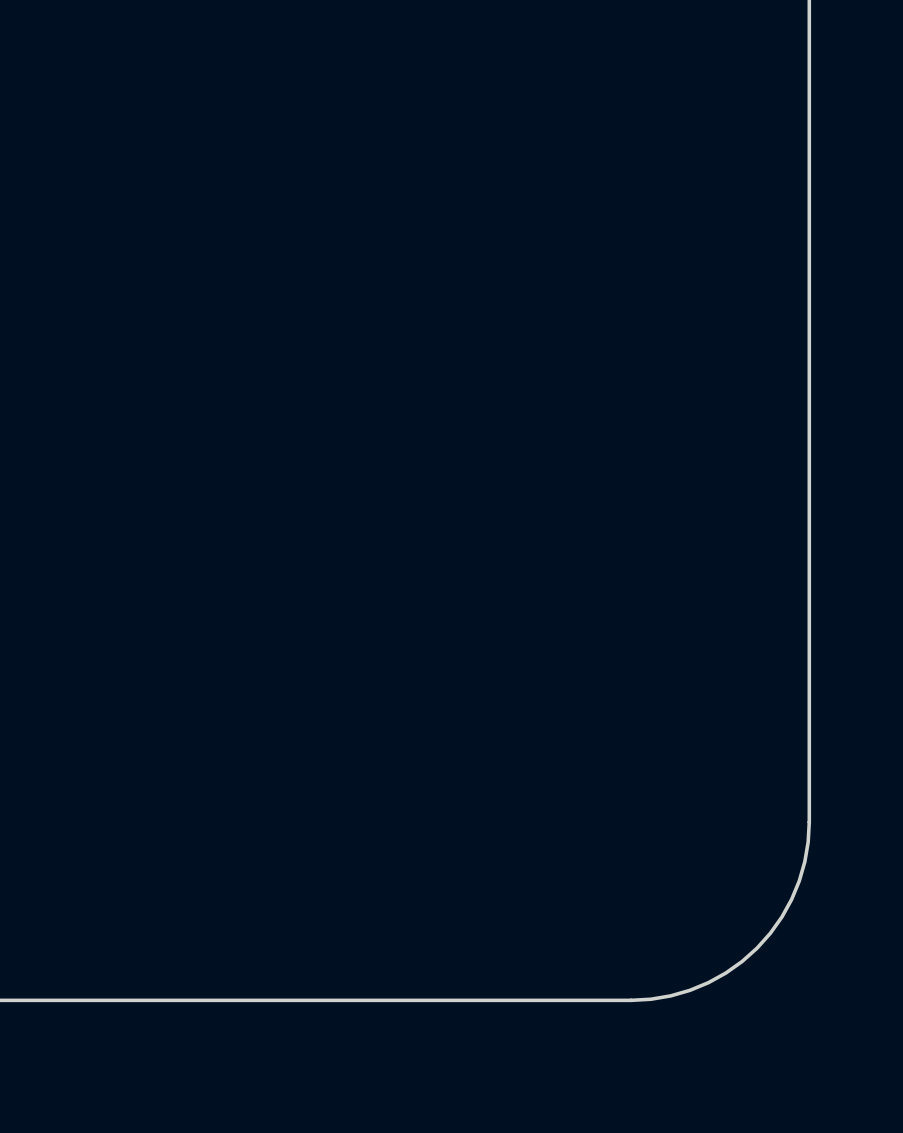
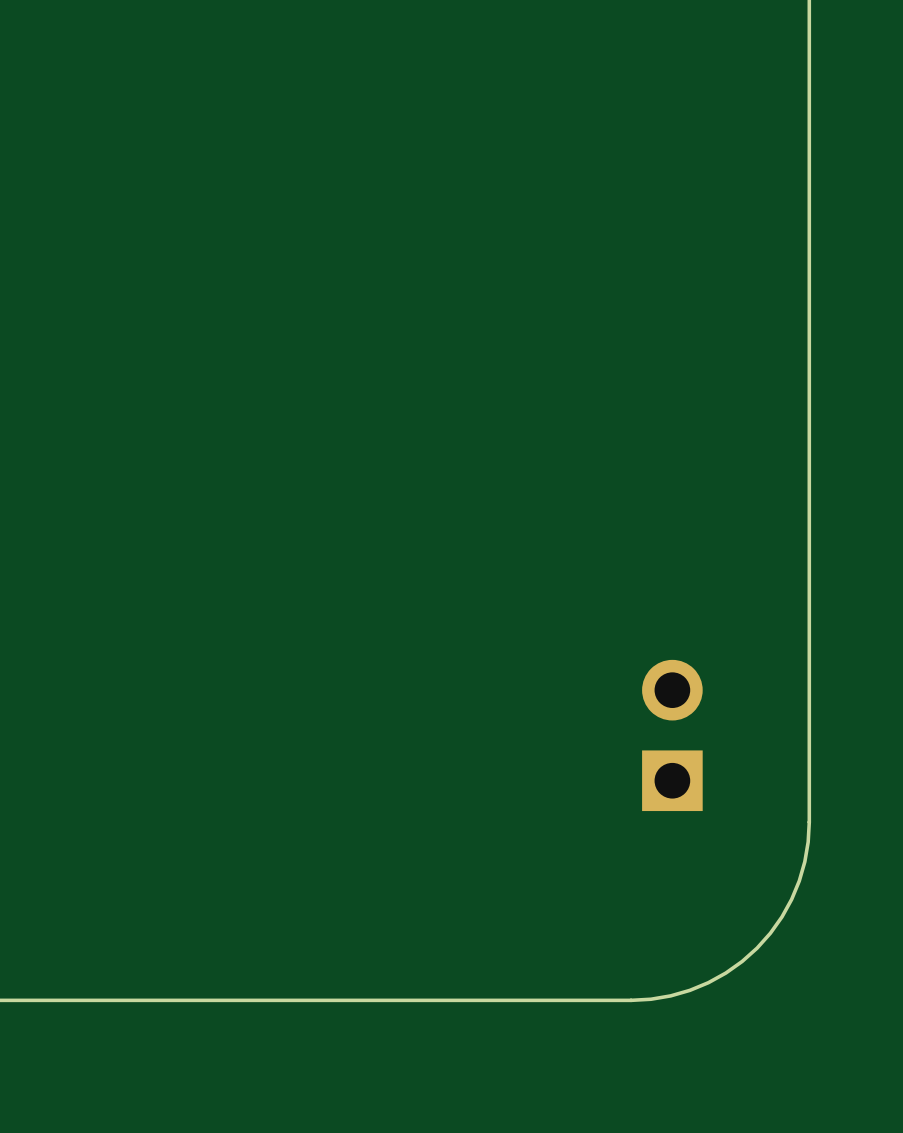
part: none -> (672, 735)

